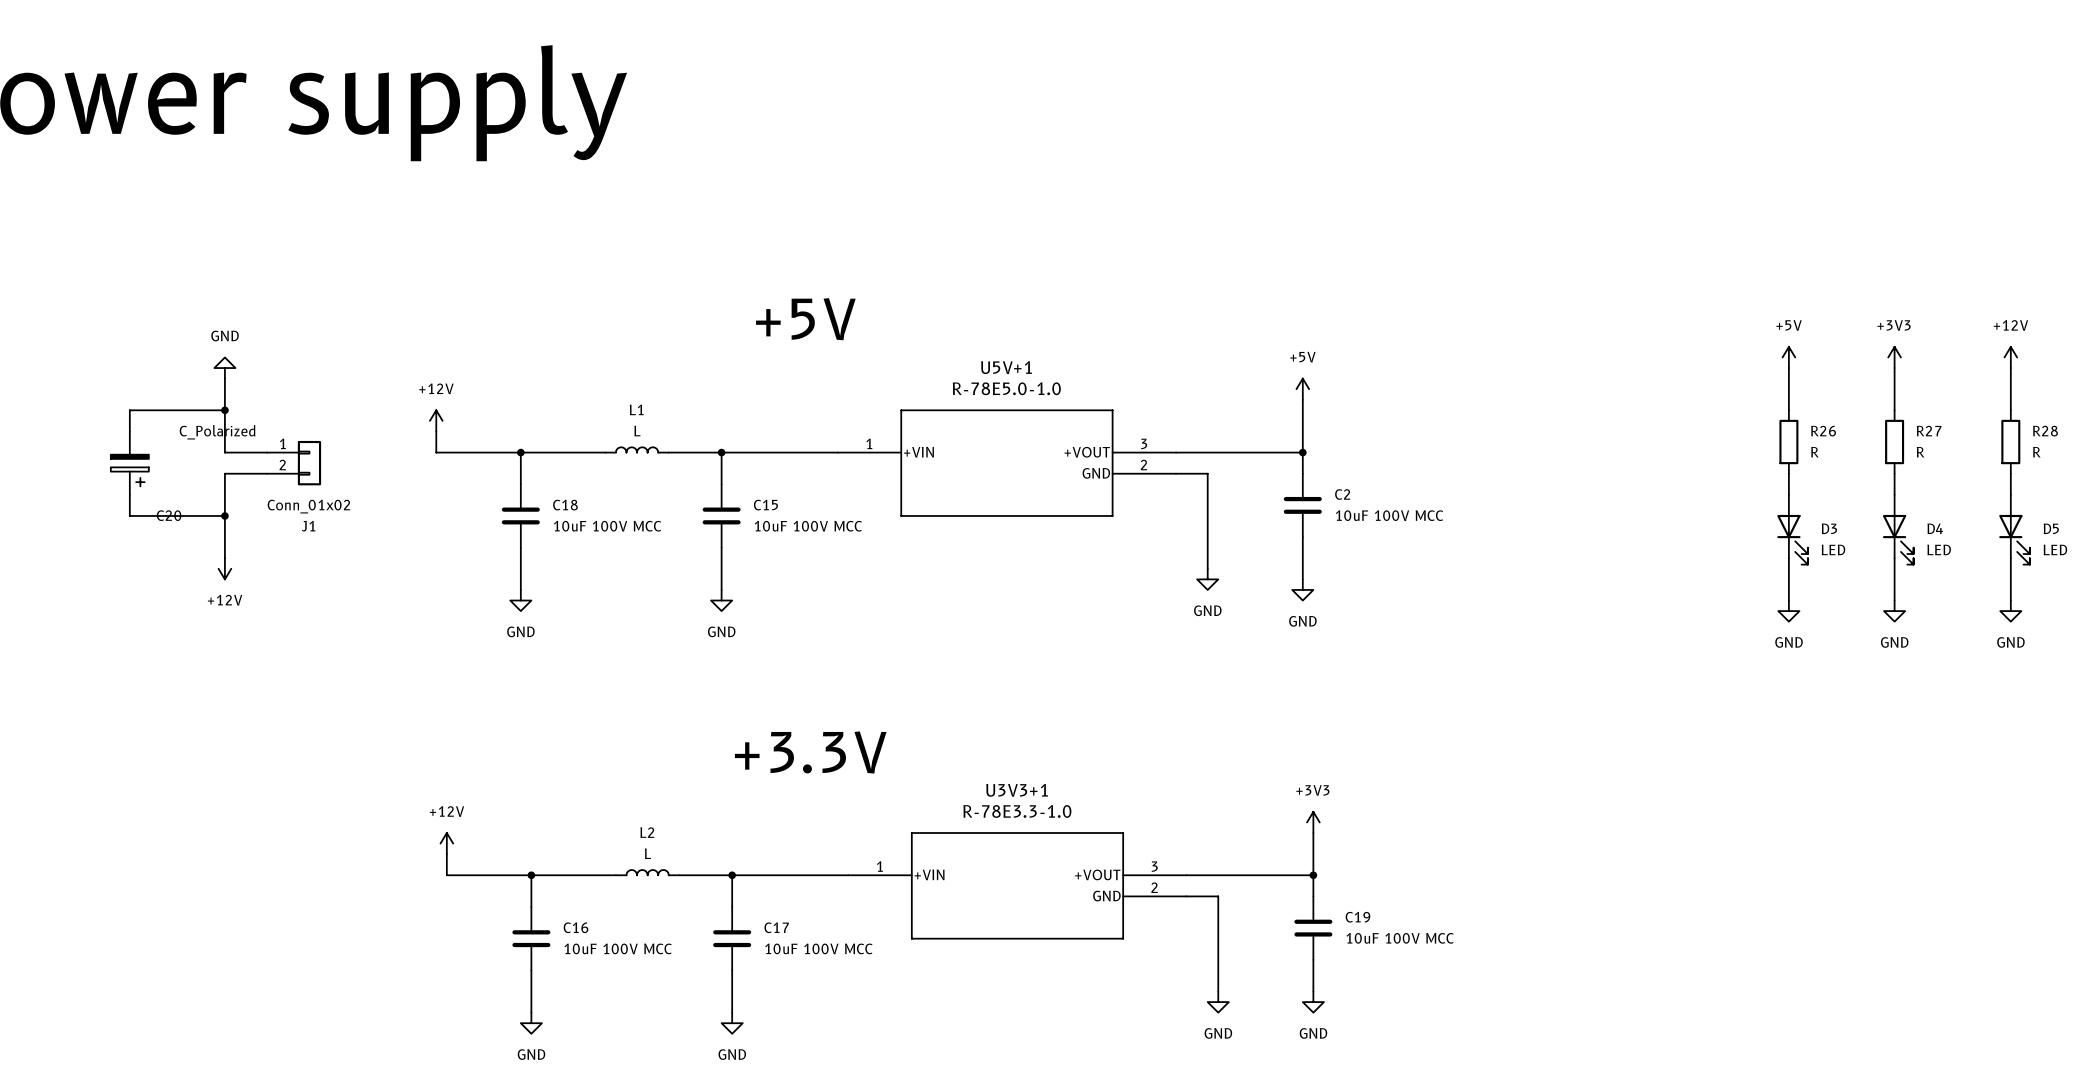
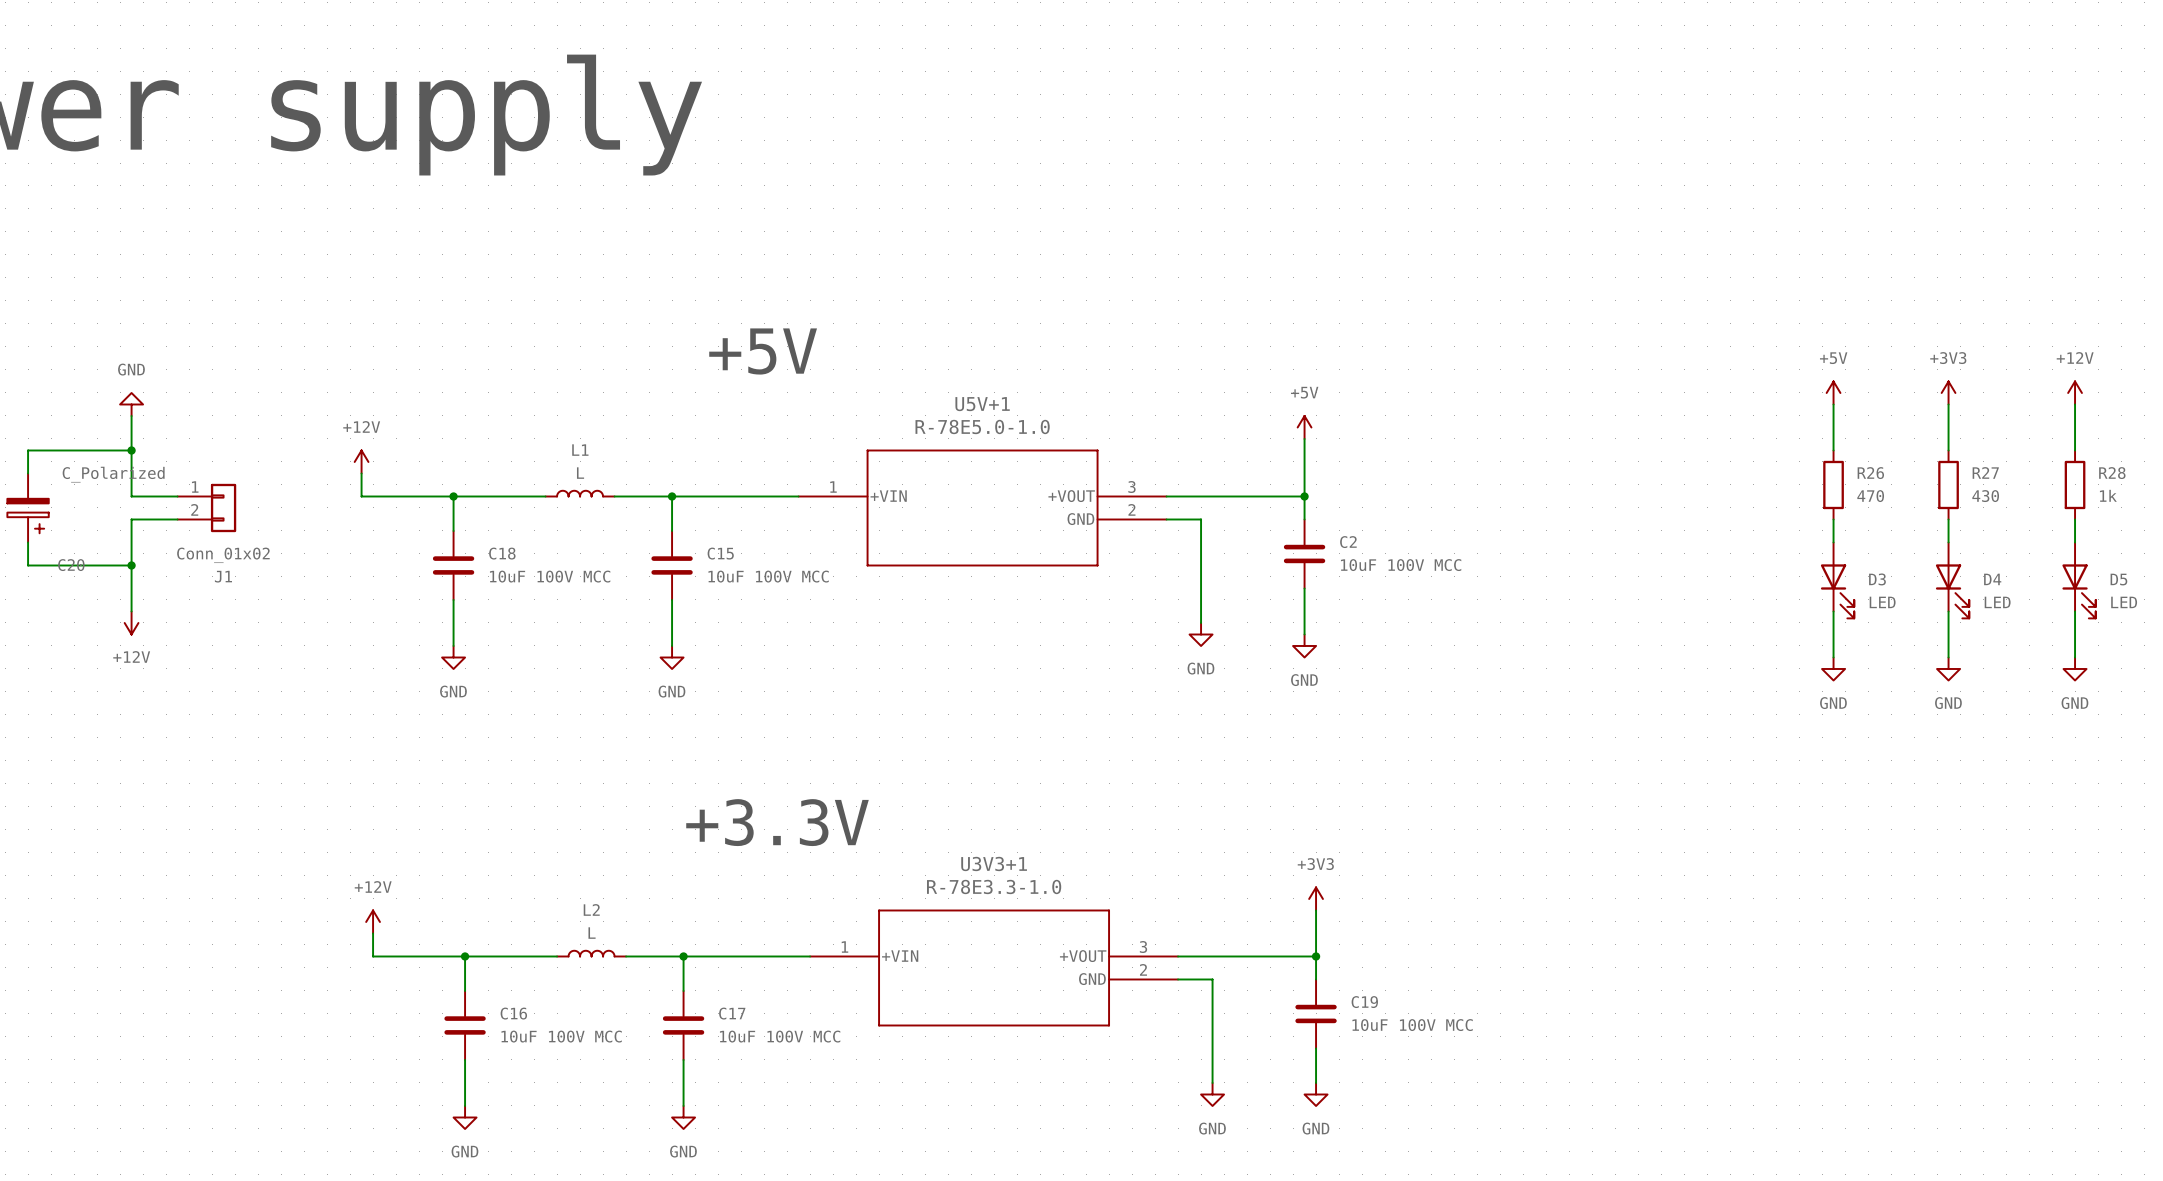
R26 value: R (1814, 452) -> 470 (1870, 496)
R27 value: R (1920, 452) -> 430 (1985, 496)
R28 value: R (2036, 452) -> 1k (2108, 495)

